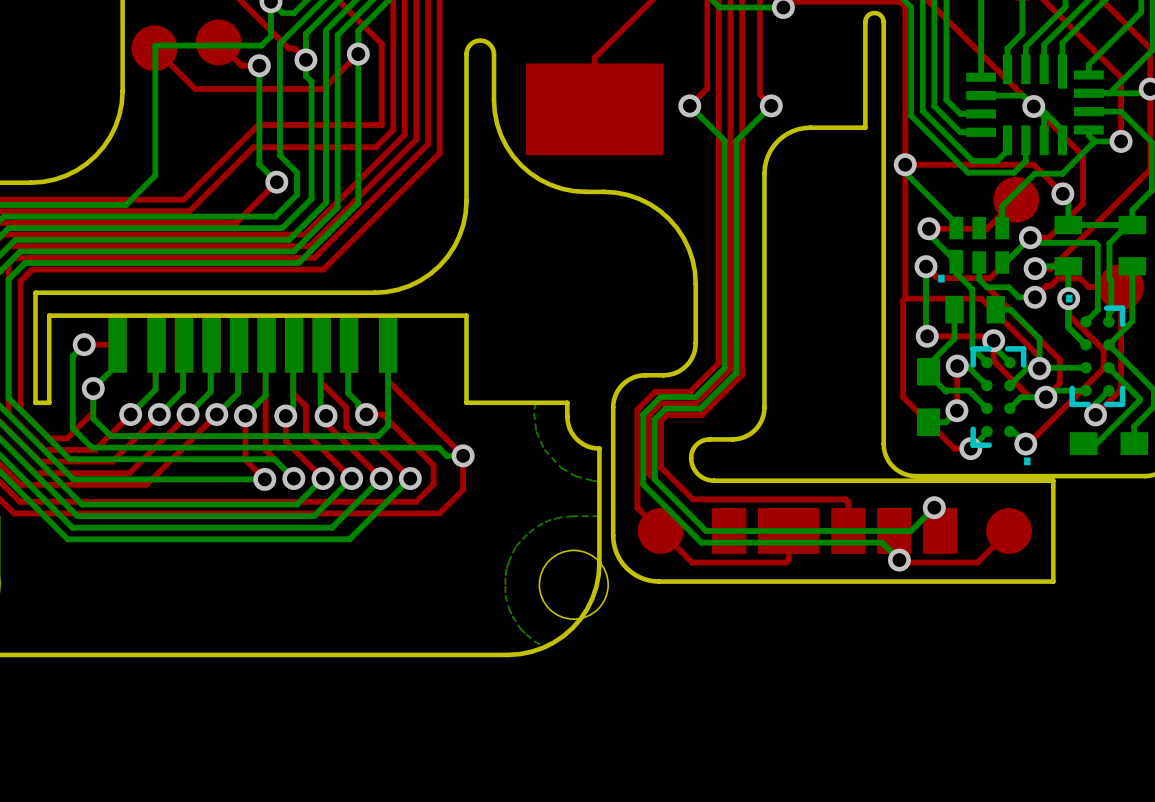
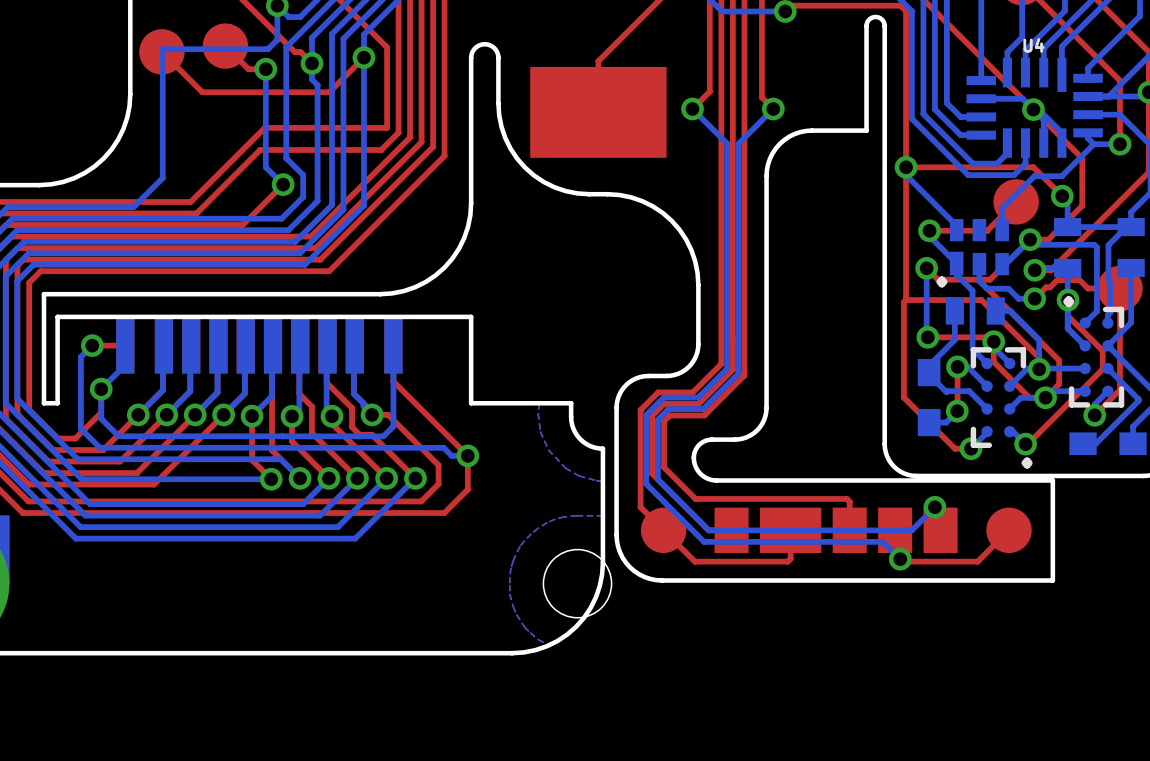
U4 name: none -> U4 (1033, 45)

